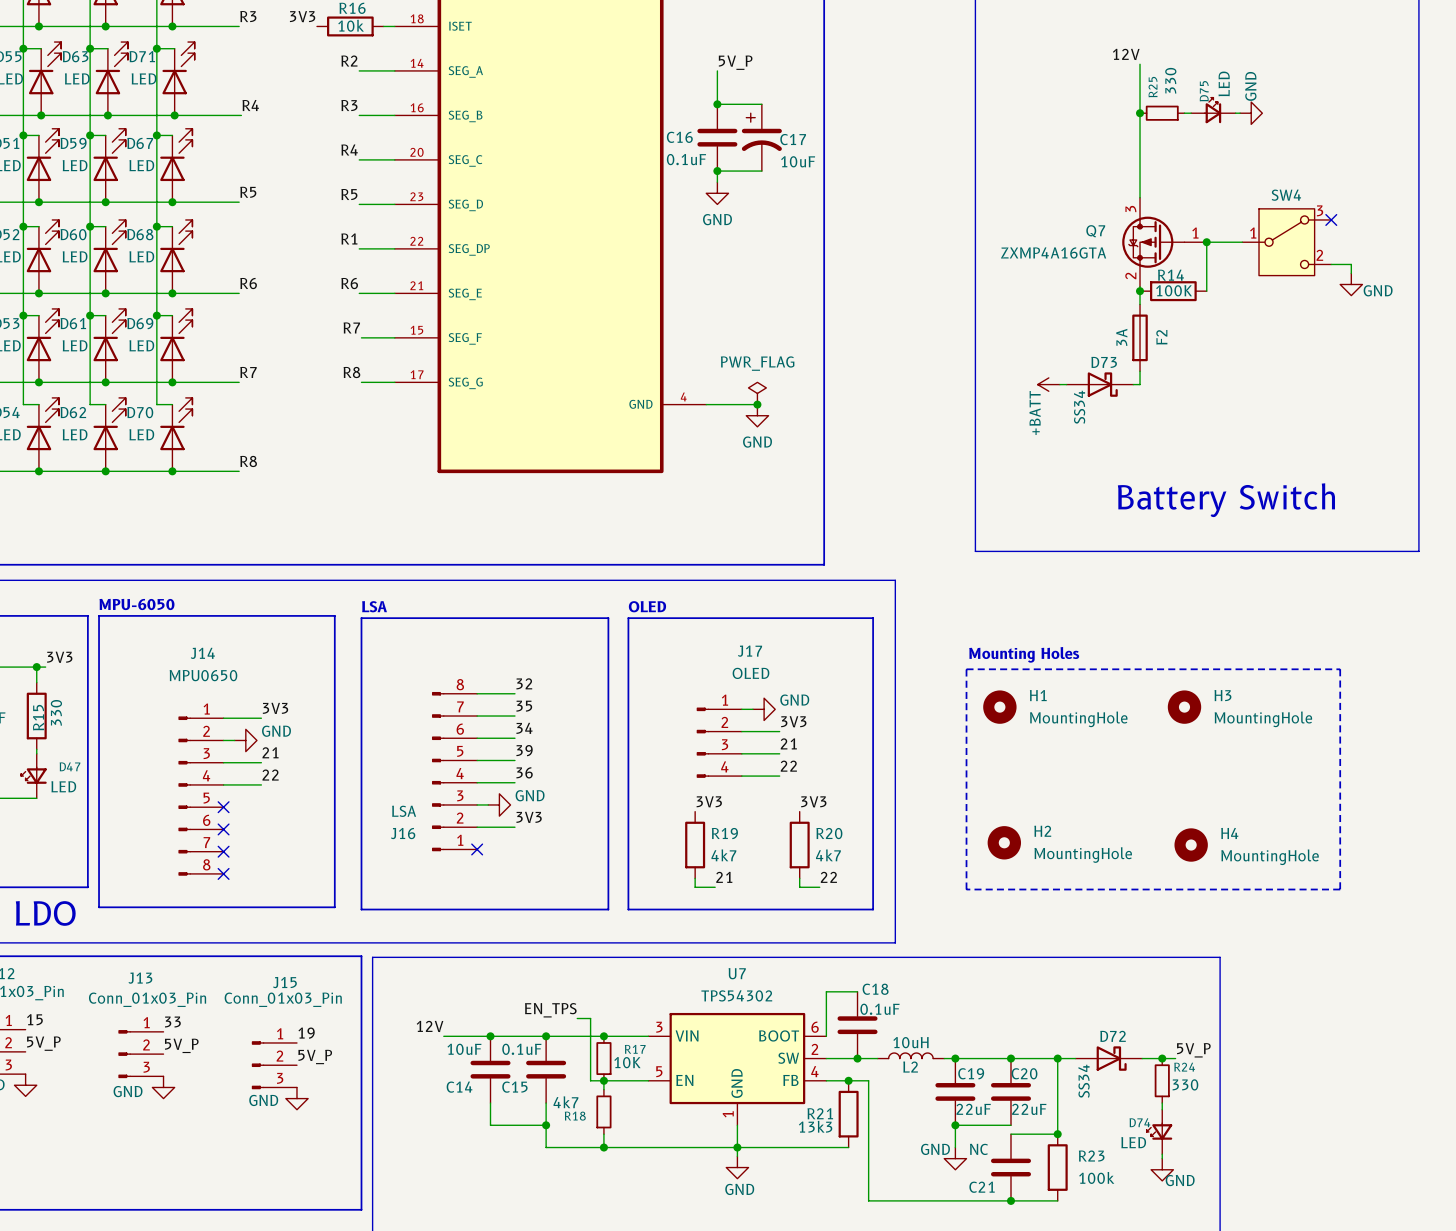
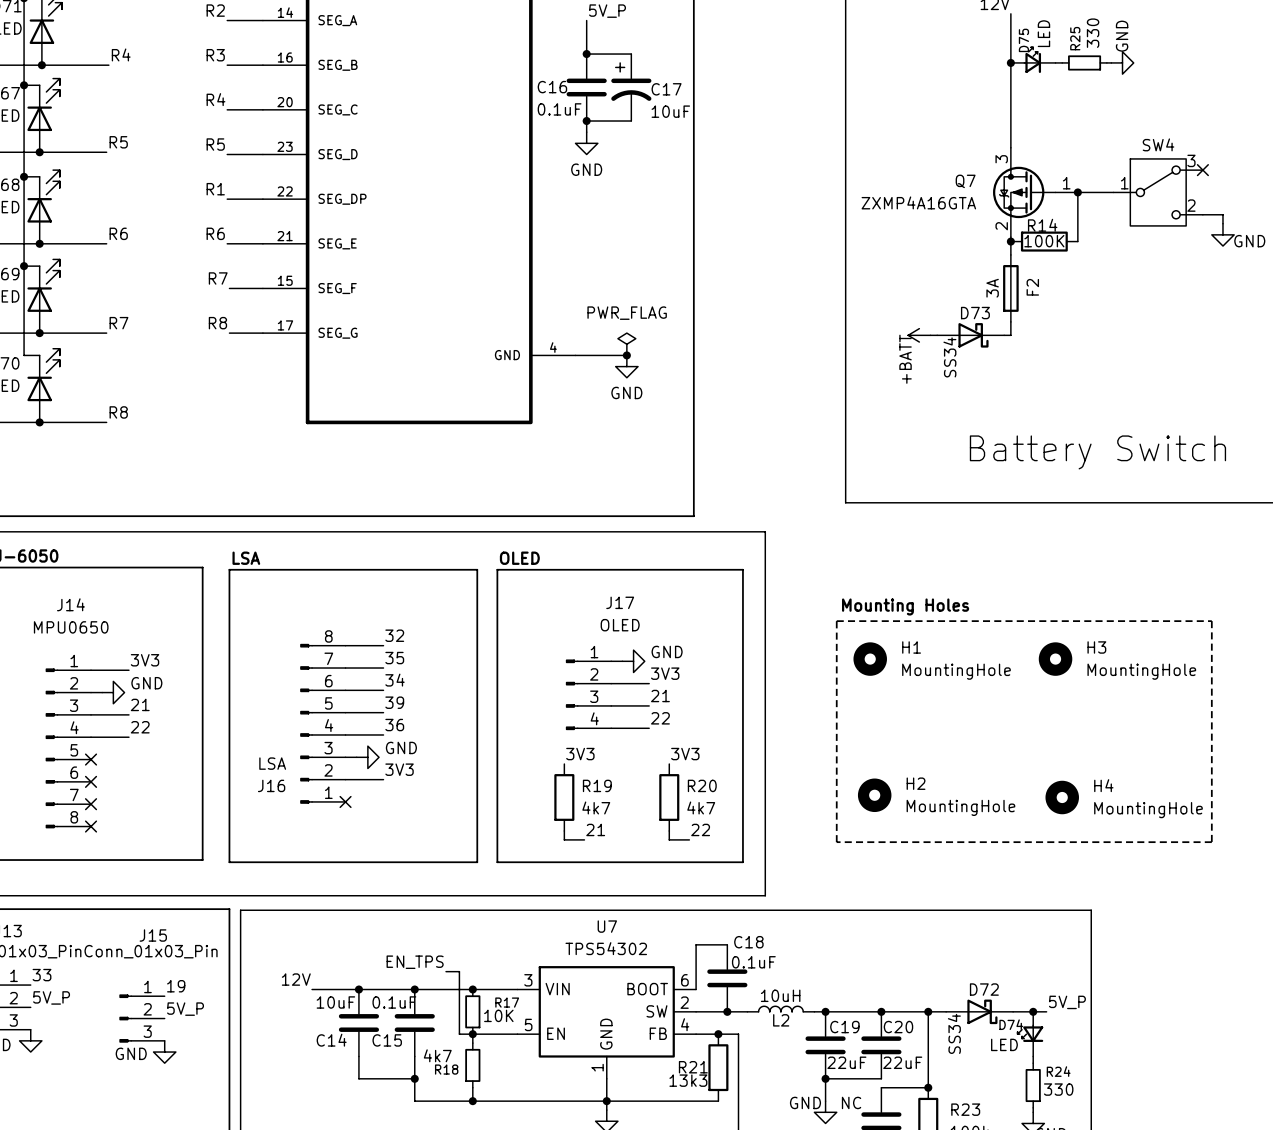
D75 position: (1213, 110) -> (1033, 60)
R25 position: (1162, 113) -> (1084, 62)
R24 position: (1162, 1080) -> (1033, 1085)
D74 position: (1159, 1131) -> (1030, 1034)

